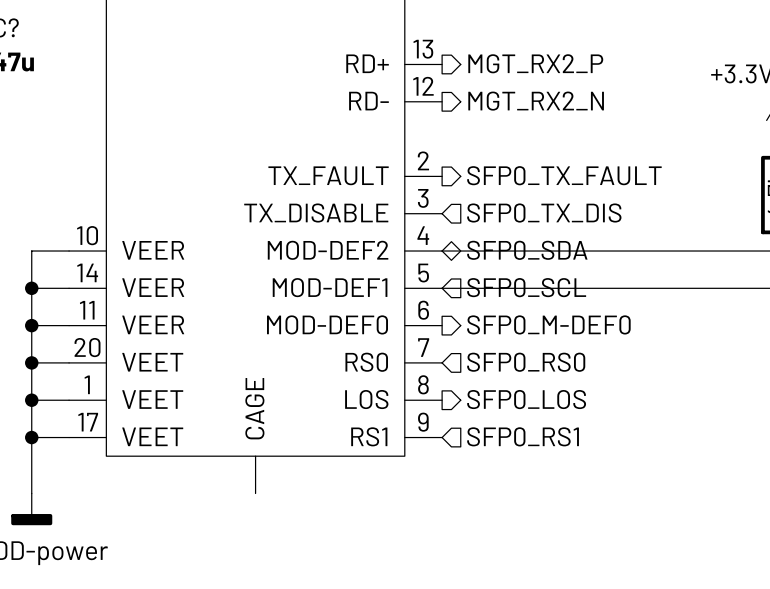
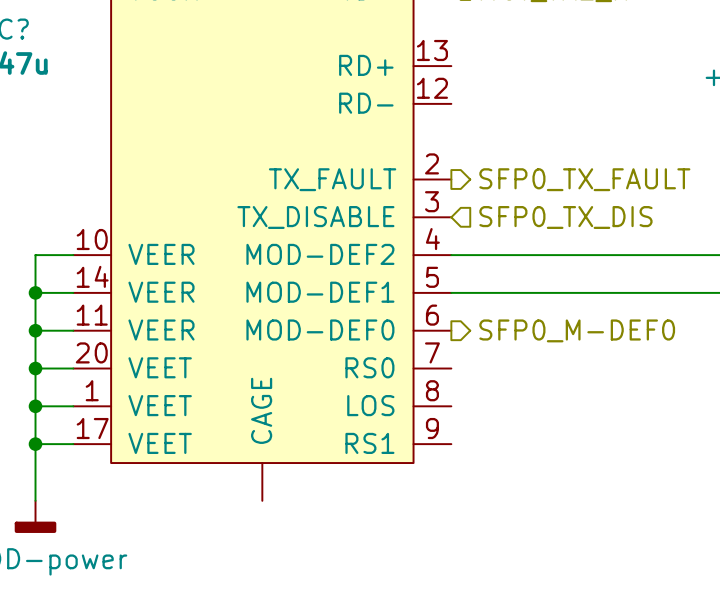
hierarchical label: MGT_RX2_P (535, 63) -> none
hierarchical label: MGT_RX2_N (536, 101) -> none
hierarchical label: SFP0_SDA (527, 250) -> none
hierarchical label: SFP0_SCL (526, 287) -> none
hierarchical label: SFP0_RS0 (526, 362) -> none
hierarchical label: SFP0_LOS (526, 399) -> none
hierarchical label: SFP0_RS1 (523, 436) -> none

